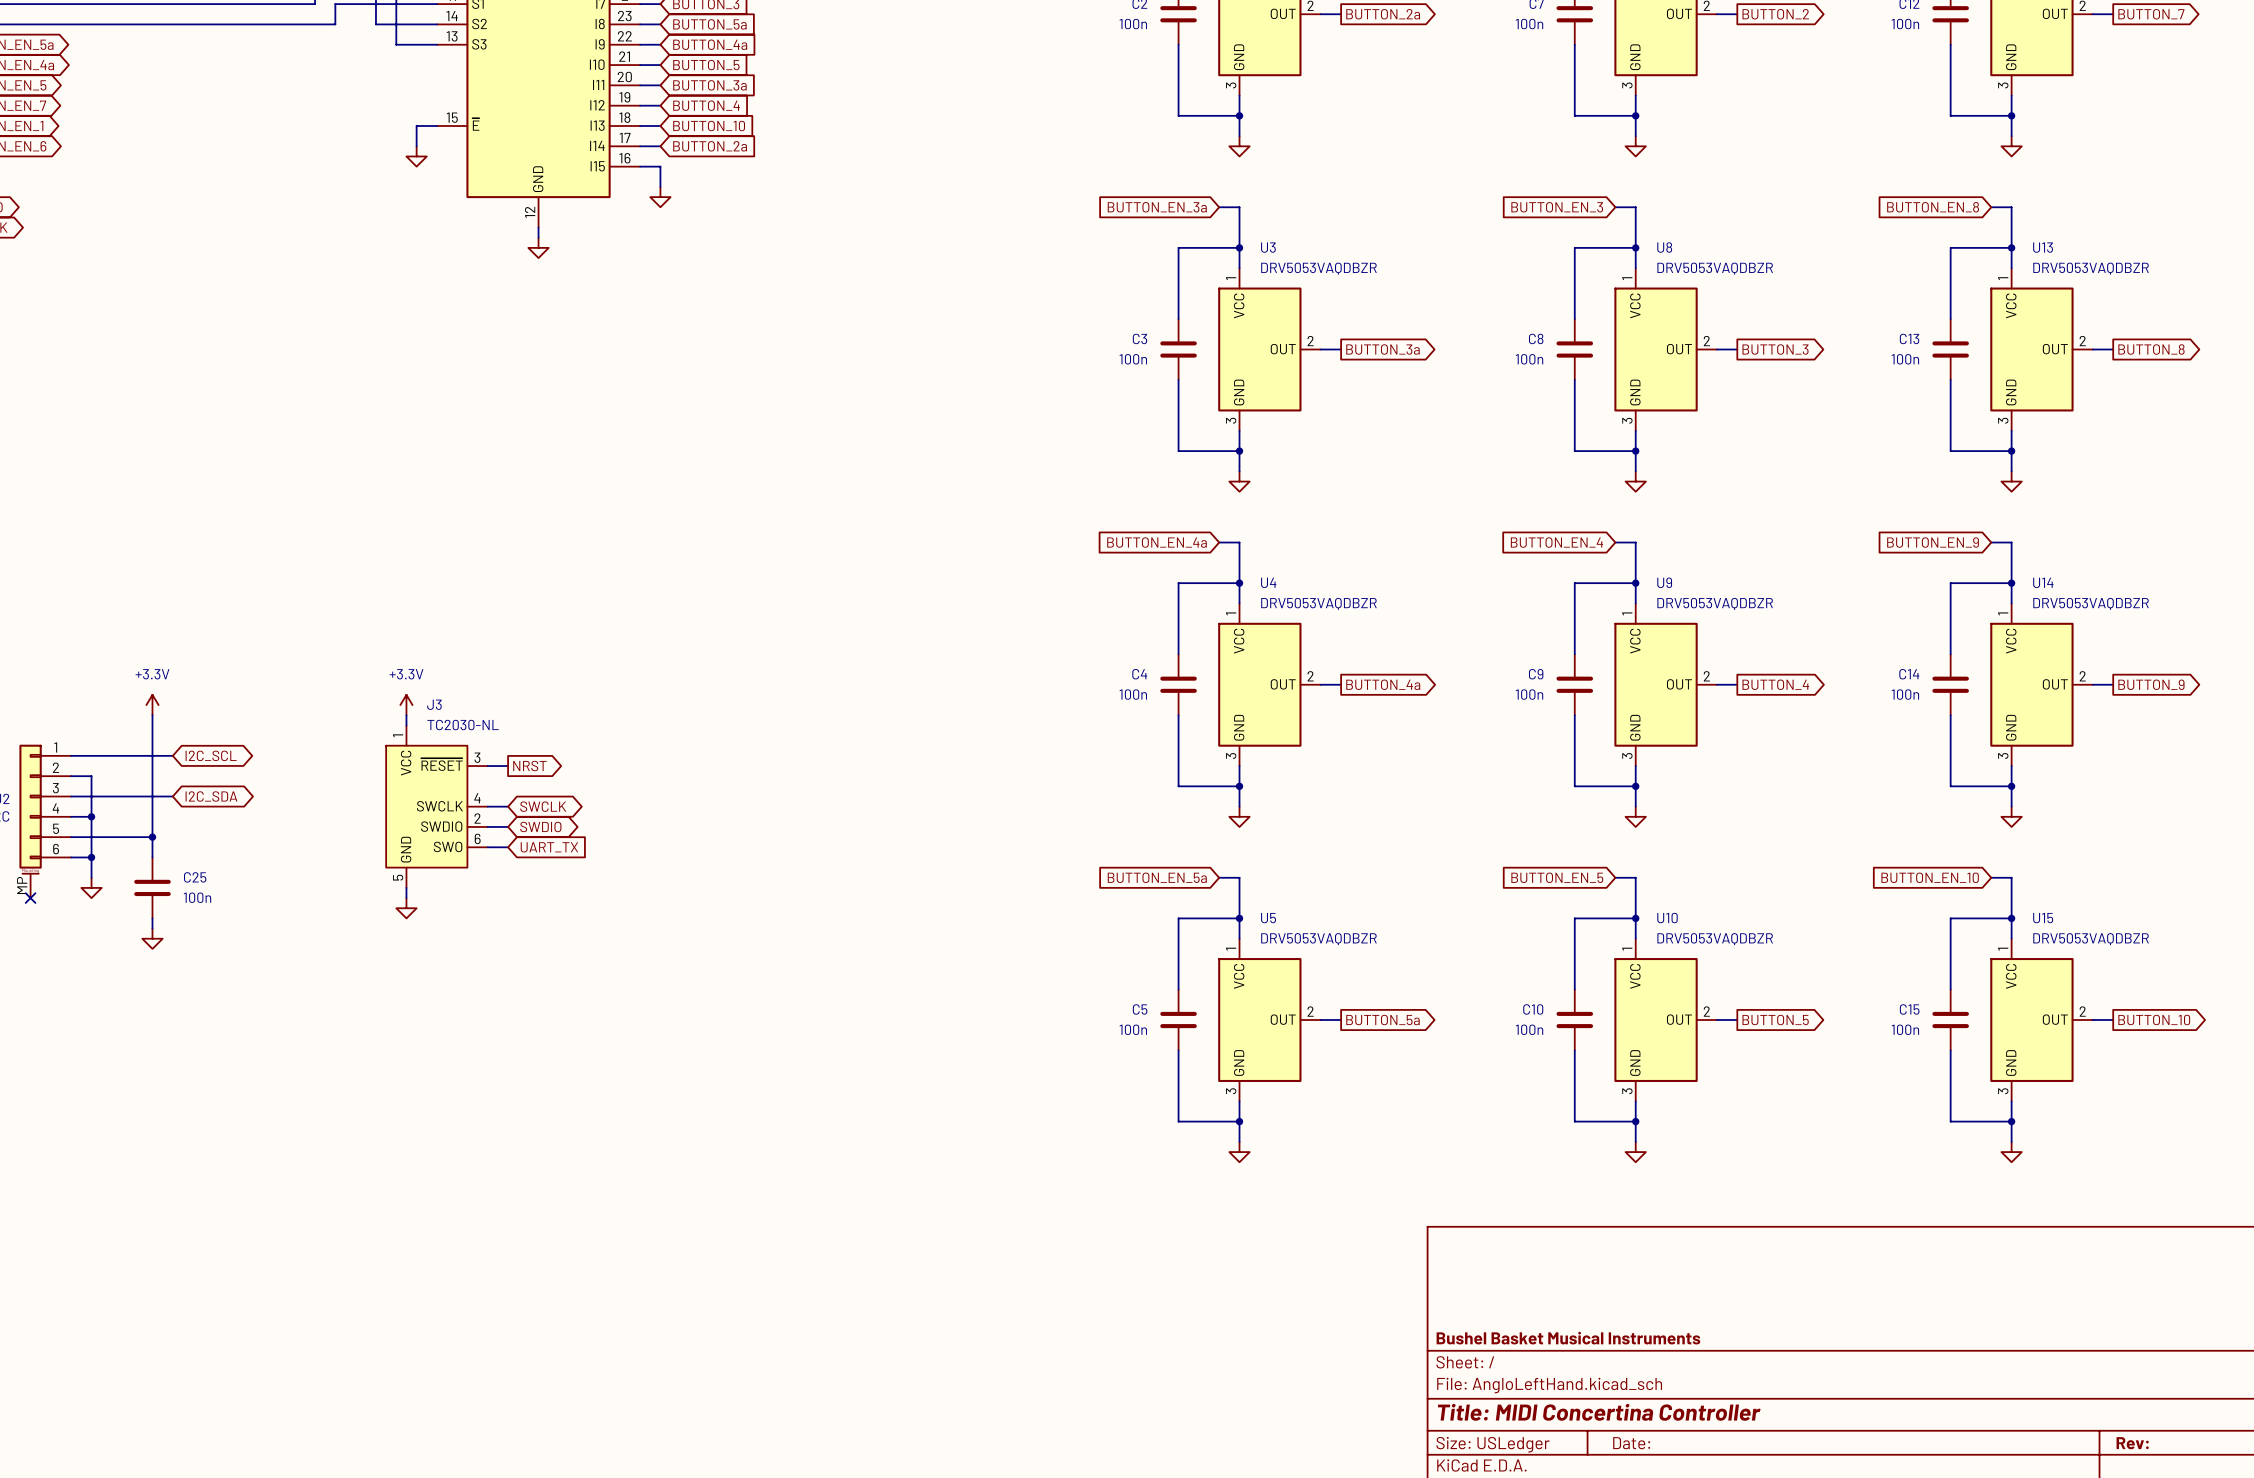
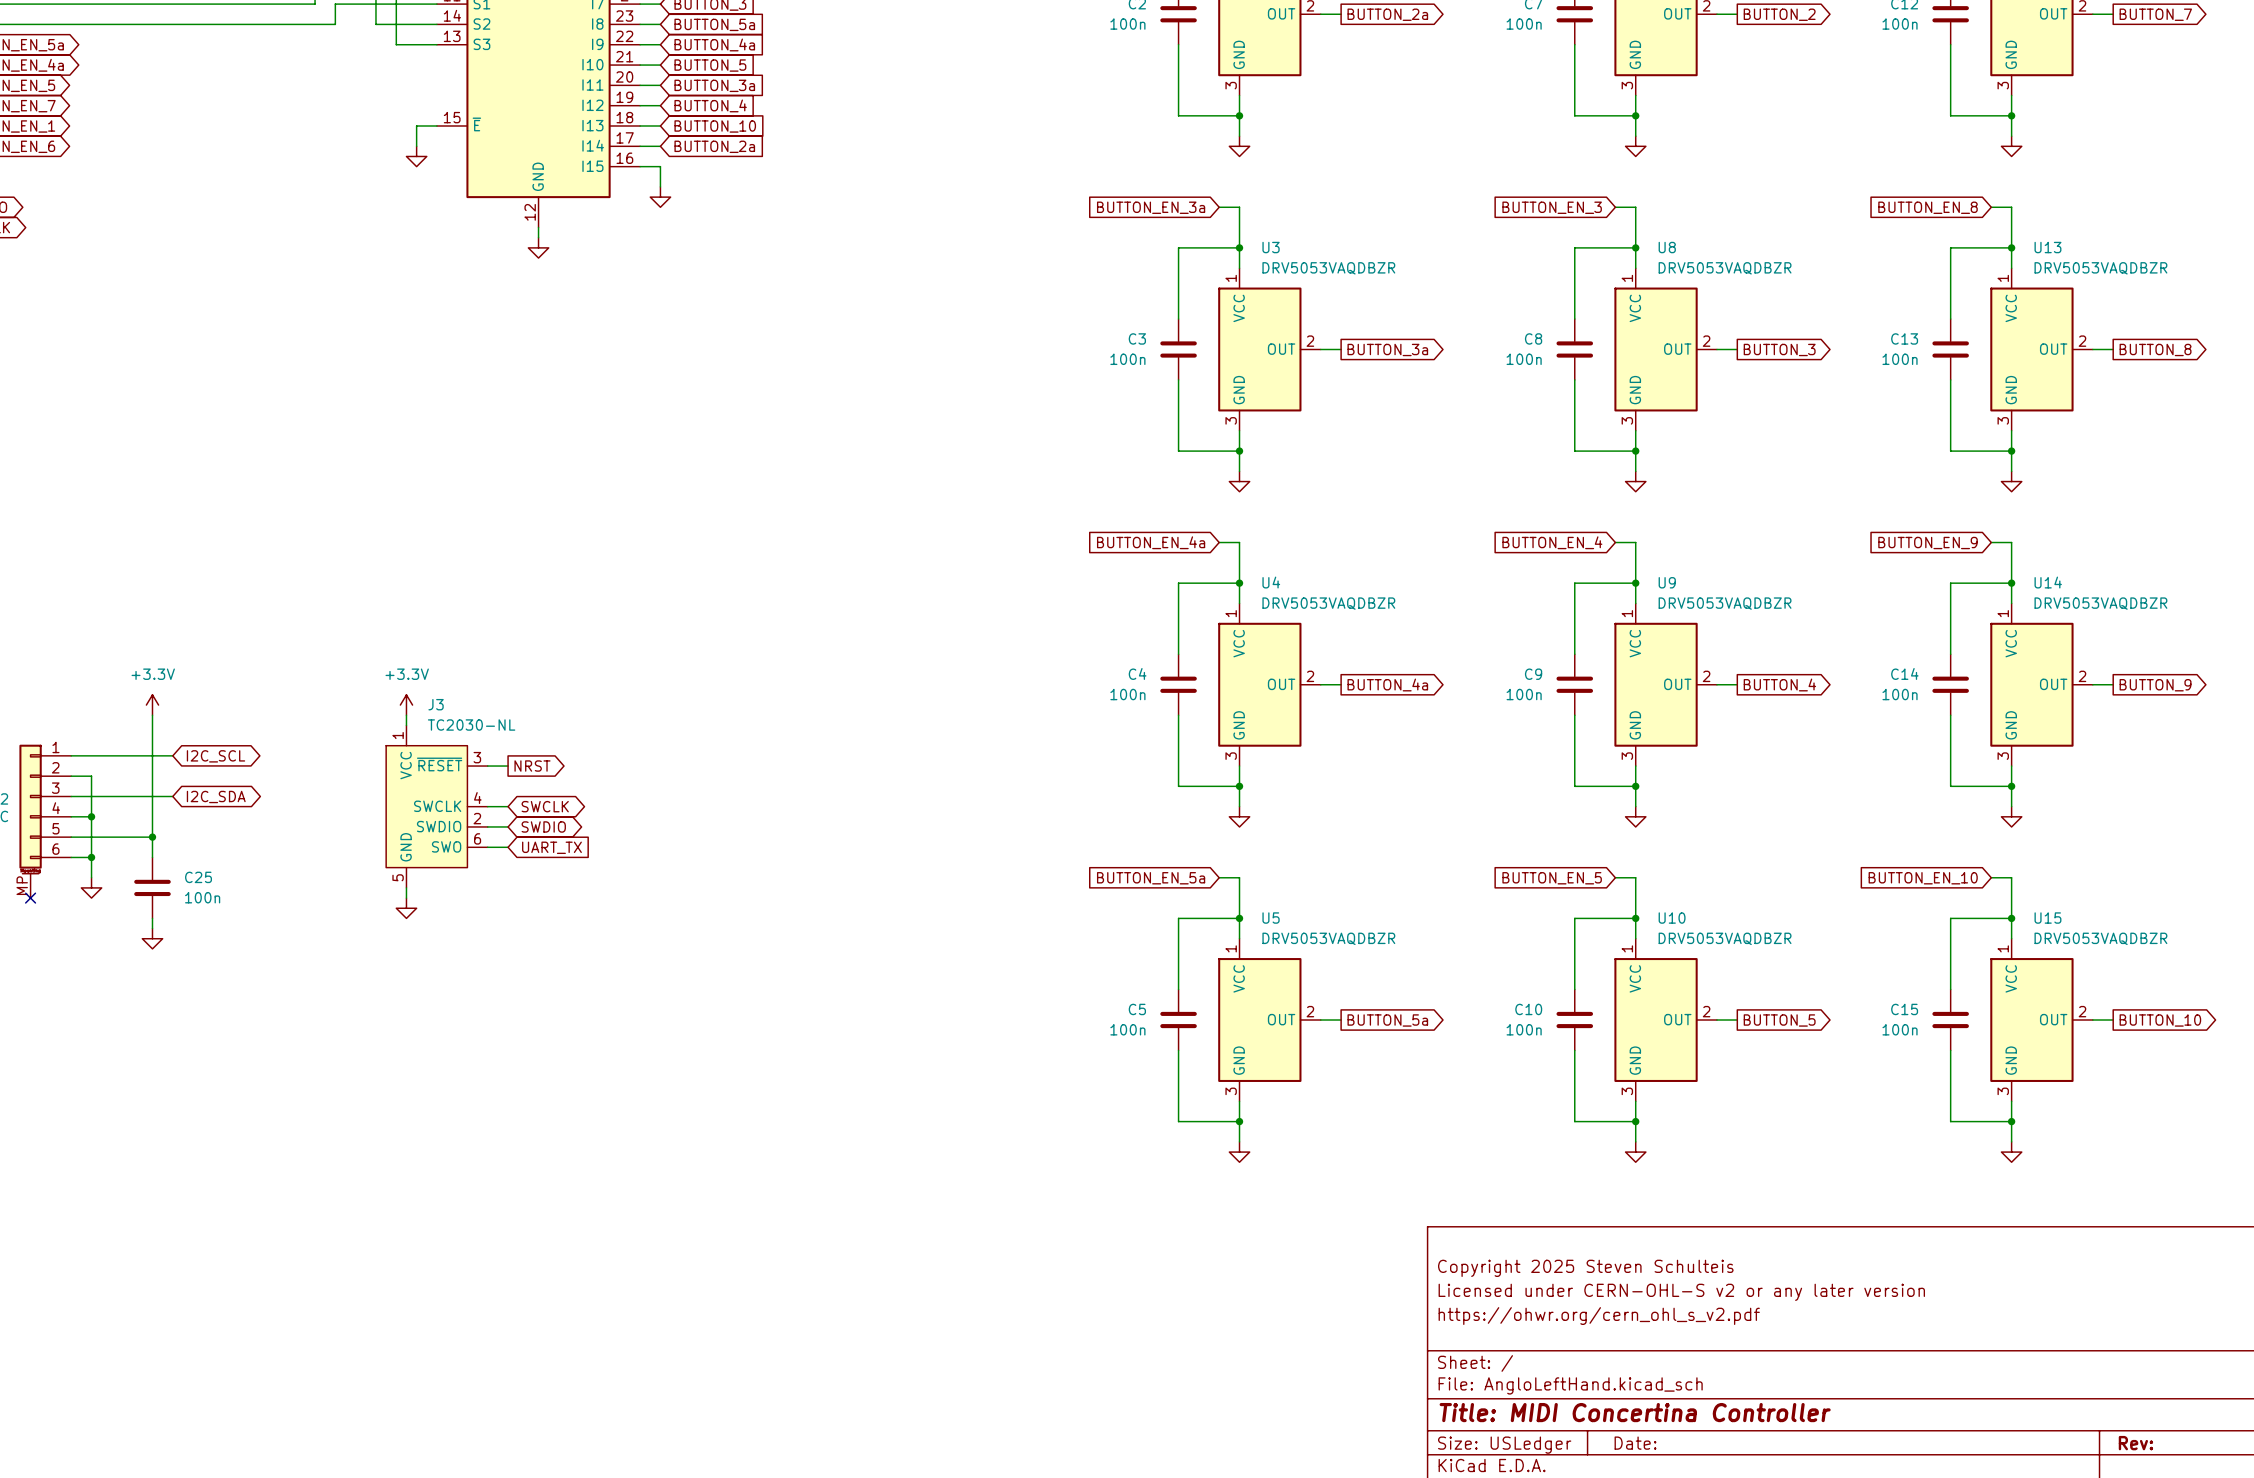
title block: none -> Copyright 2025 Steven Schulteis (1585, 1268)
title block: none -> Licensed under CERN-OHL-S v2 or any later version (1681, 1292)
title block: none -> https://ohwr.org/cern_ohl_s_v2.pdf (1599, 1316)
title block: Bushel Basket Musical Instruments (1568, 1338) -> none

